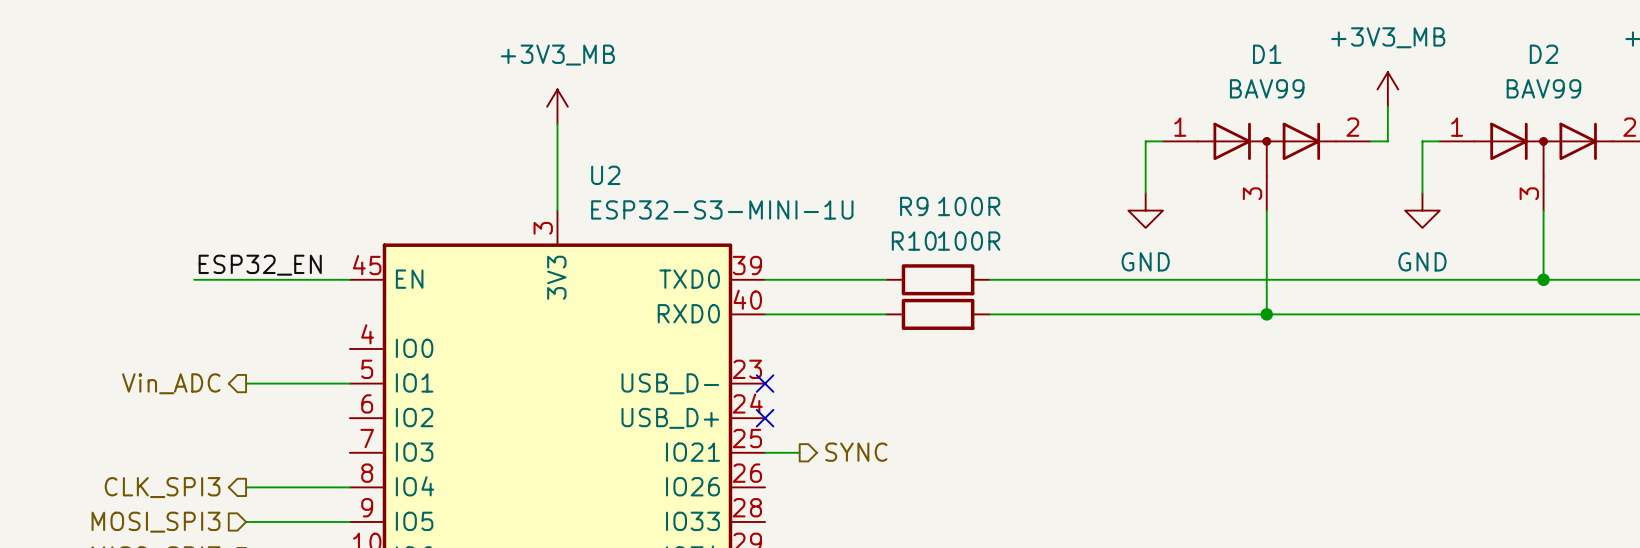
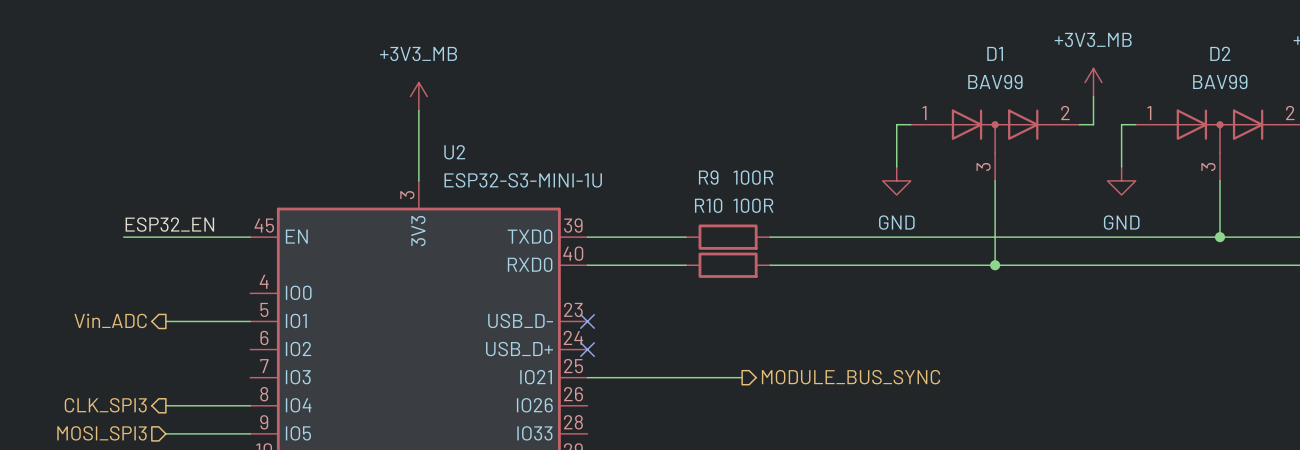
wire: none -> (615, 377) (742, 377)
hierarchical label: SYNC (856, 452) -> none
hierarchical label: none -> MODULE_BUS_SYNC (851, 377)

